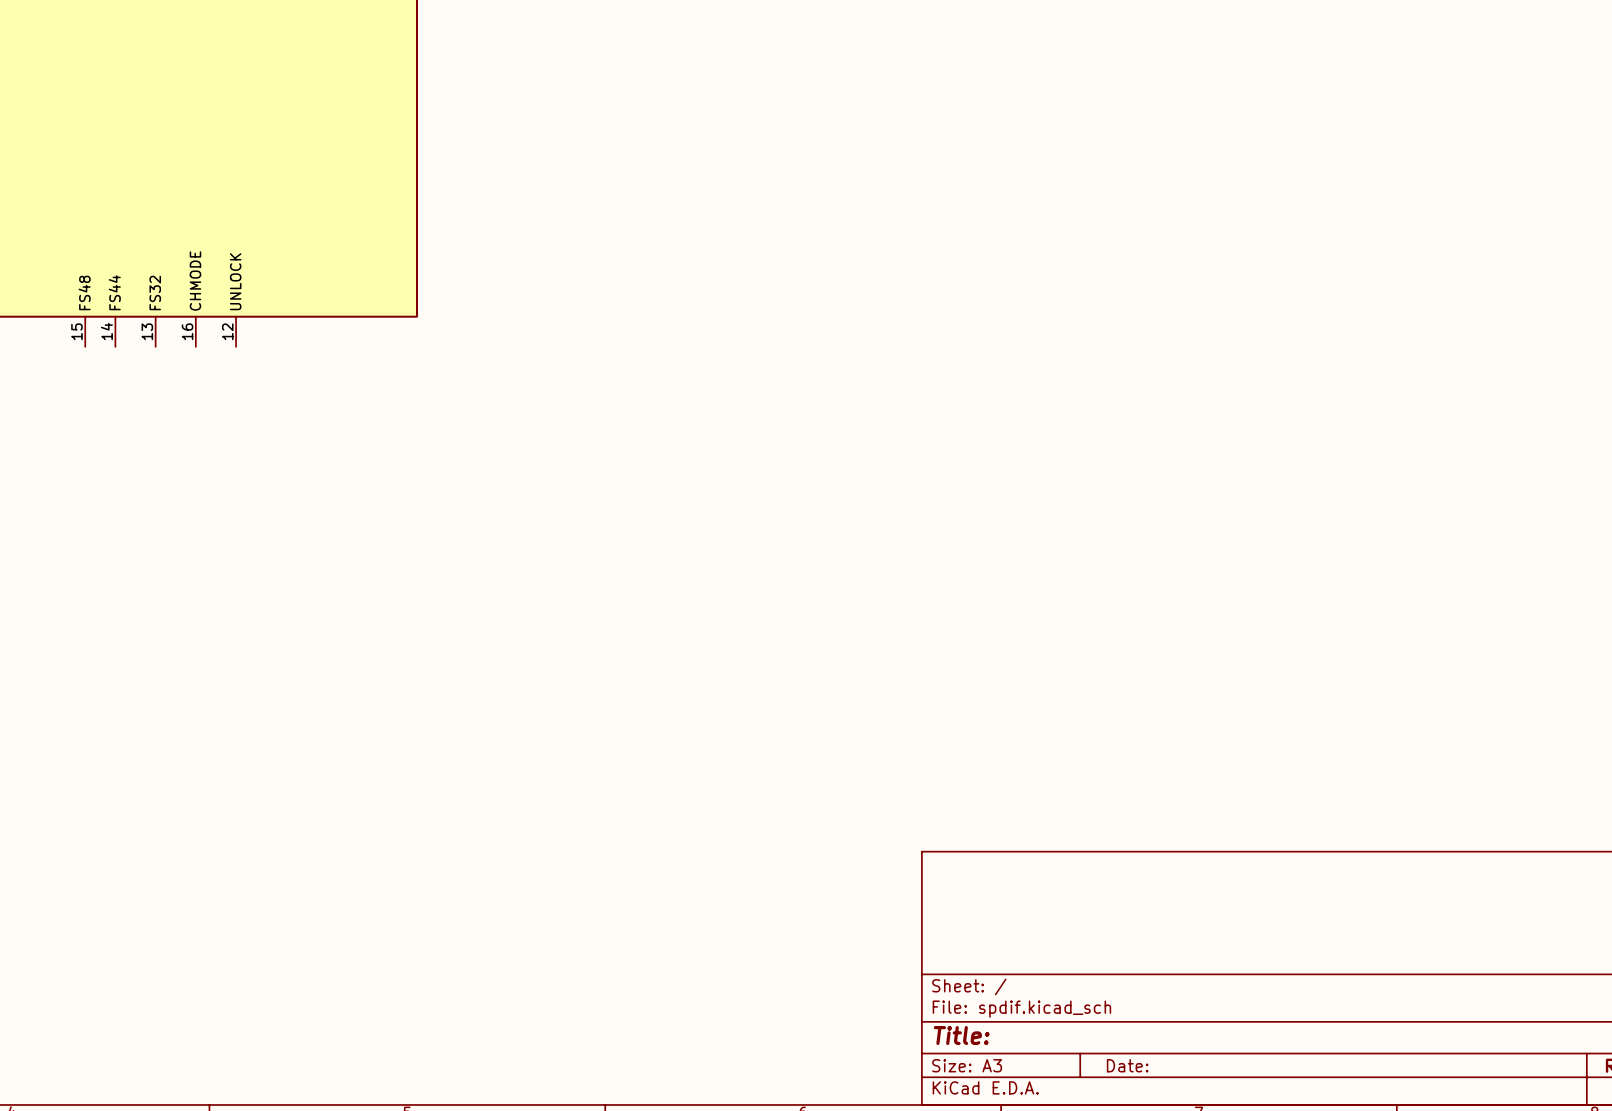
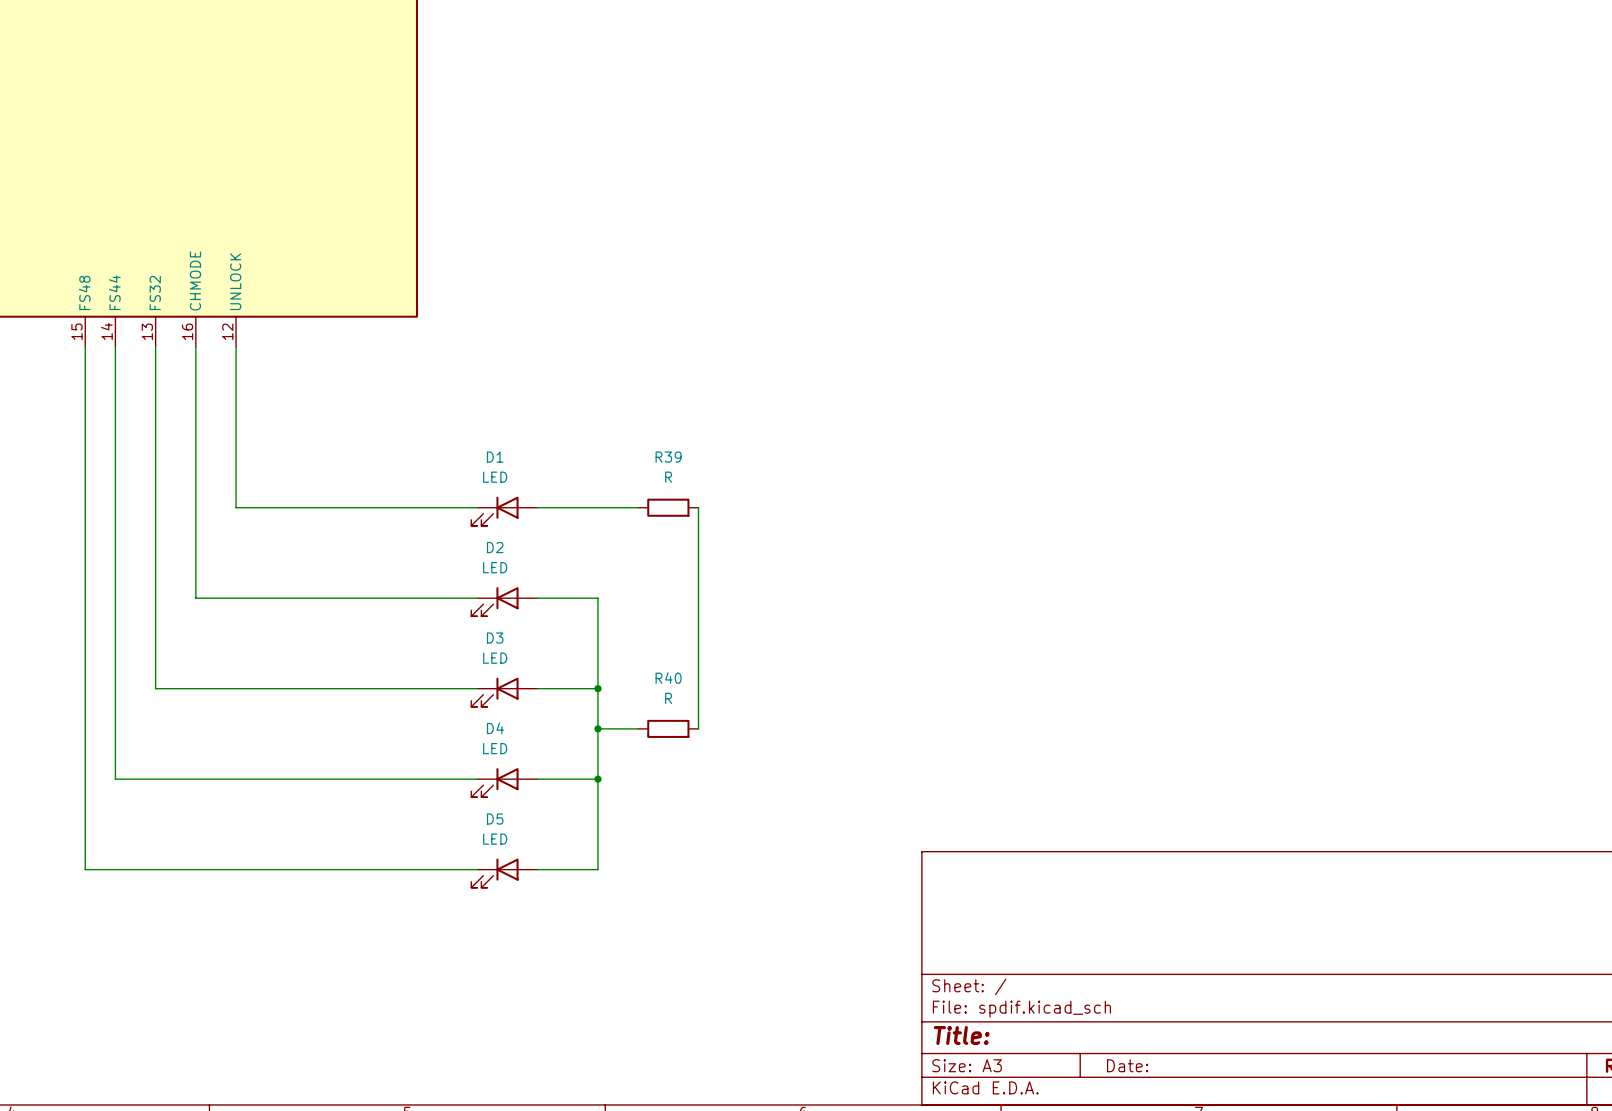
wire: none -> (85, 346) (85, 869) (477, 869)
wire: none -> (115, 346) (115, 779) (477, 779)
wire: none -> (155, 346) (155, 688) (477, 688)
wire: none -> (195, 346) (195, 598) (477, 598)
wire: none -> (236, 346) (236, 507) (477, 507)
wire: none -> (537, 507) (638, 507)
R39: none -> R (668, 507)
wire: none -> (698, 507) (698, 728)
D1: none -> LED (504, 511)
wire: none -> (537, 598) (597, 598) (597, 869) (537, 869)
D2: none -> LED (504, 601)
wire: none -> (537, 688) (597, 688)
junction: none -> (597, 688)
D3: none -> LED (504, 692)
wire: none -> (597, 728) (638, 728)
junction: none -> (597, 728)
R40: none -> R (668, 728)
wire: none -> (537, 779) (597, 779)
junction: none -> (597, 779)
D4: none -> LED (504, 782)
D5: none -> LED (504, 873)

